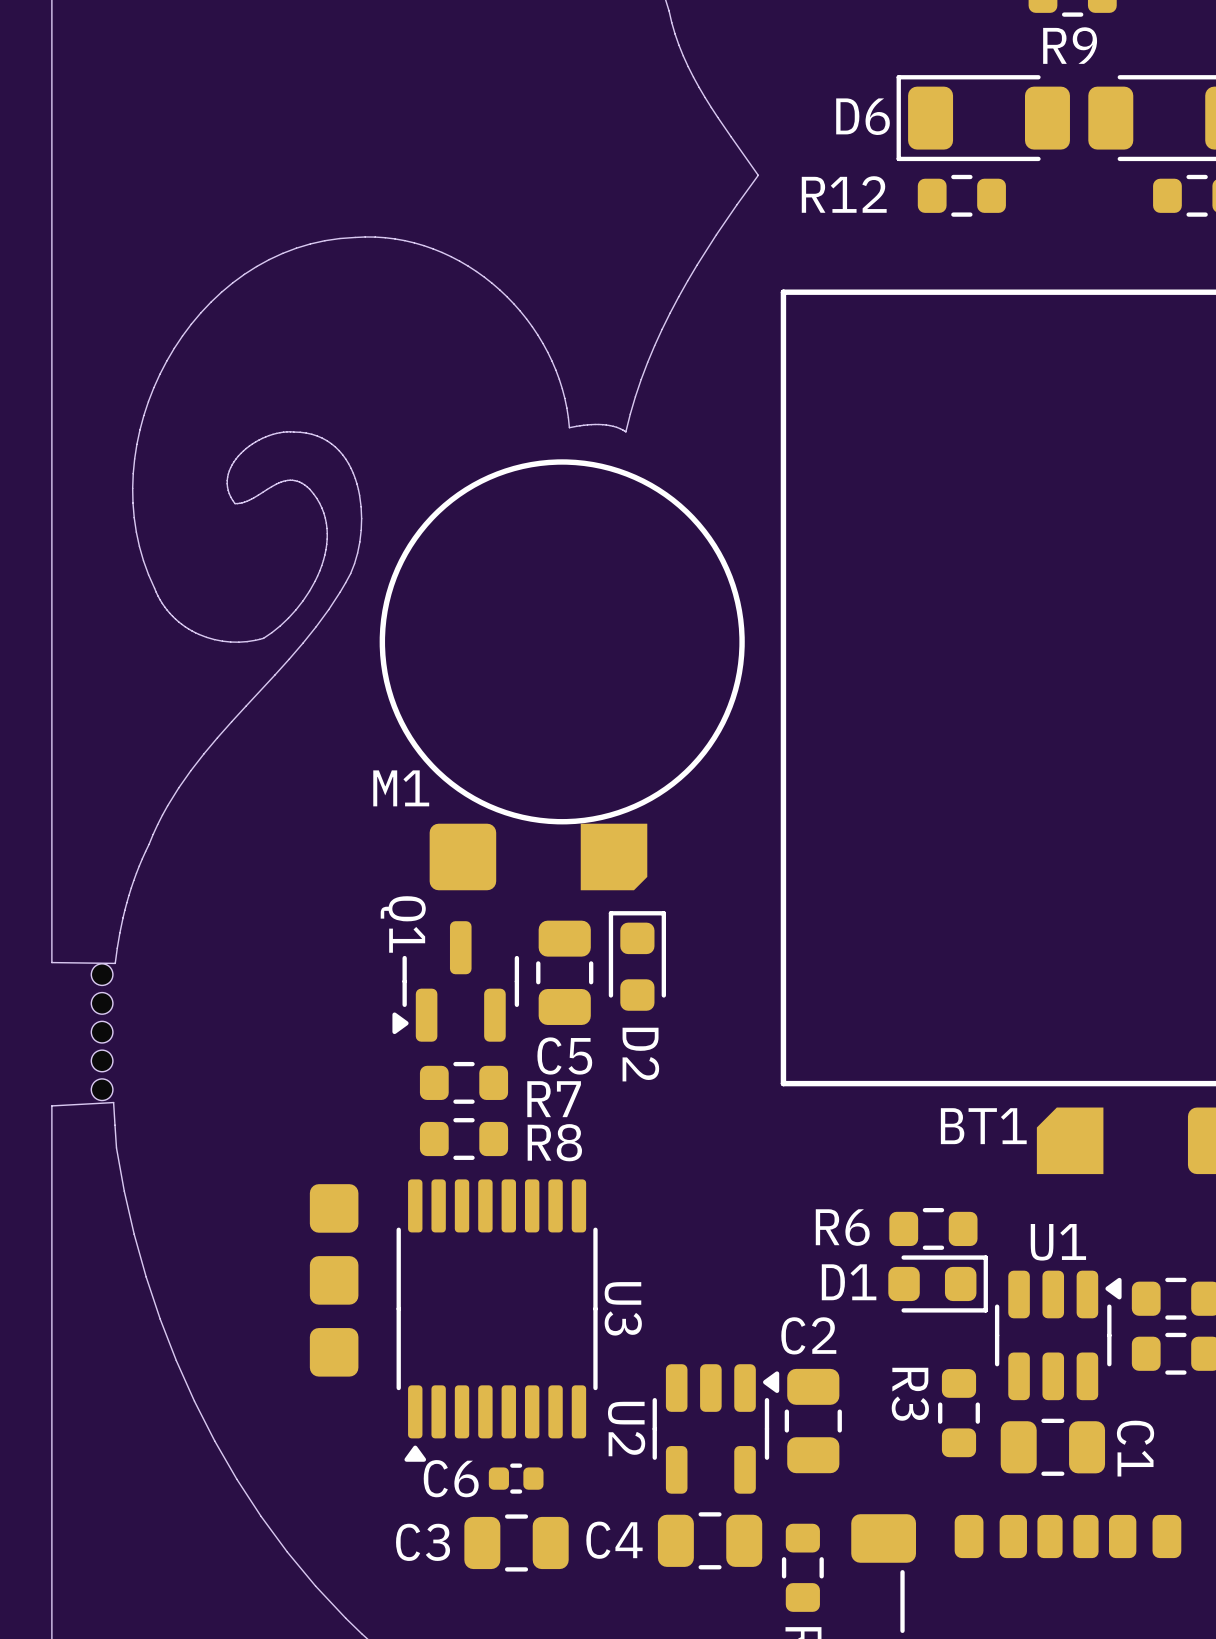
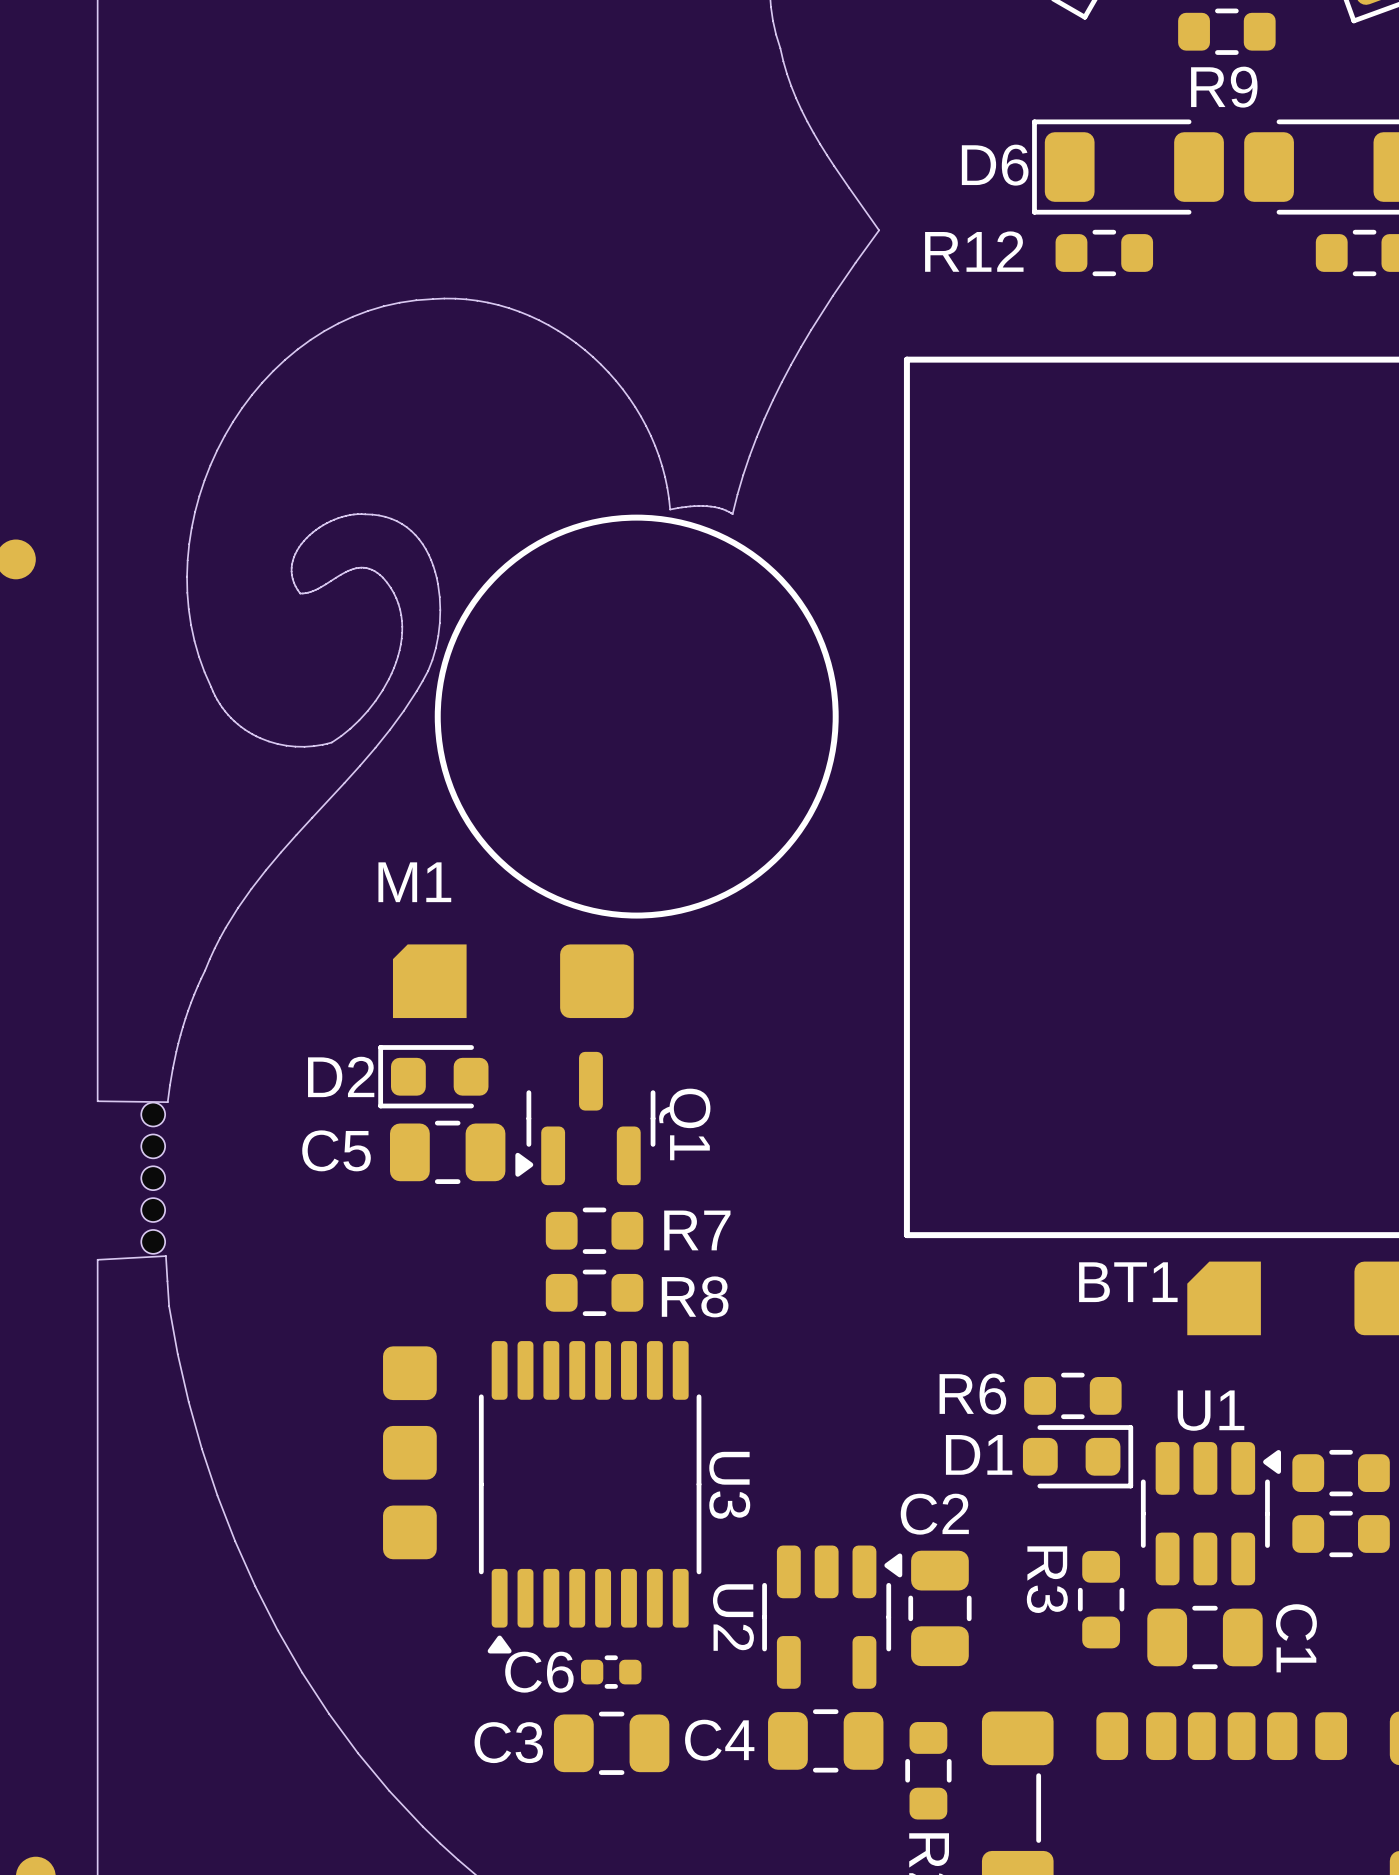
drawing position: (562, 641) -> (636, 716)
M1 rotation: 0° (538, 856) -> 180° (513, 981)
Q1 name position: Q1 (403, 924) -> Q1 (684, 1124)
D2 rotation: 0° (637, 960) -> 90° counterclockwise (433, 1076)
D2 position: (637, 960) -> (433, 1076)
C5 rotation: 0° (564, 972) -> 90° clockwise (447, 1152)
C5 position: (564, 972) -> (447, 1152)
Q1 position: (455, 981) -> (585, 1118)
D2 name position: D2 (640, 1054) -> D2 (341, 1076)
R7 position: (464, 1082) -> (594, 1230)
R7 name position: R7 (554, 1099) -> R7 (697, 1230)
R8 position: (464, 1139) -> (594, 1292)

